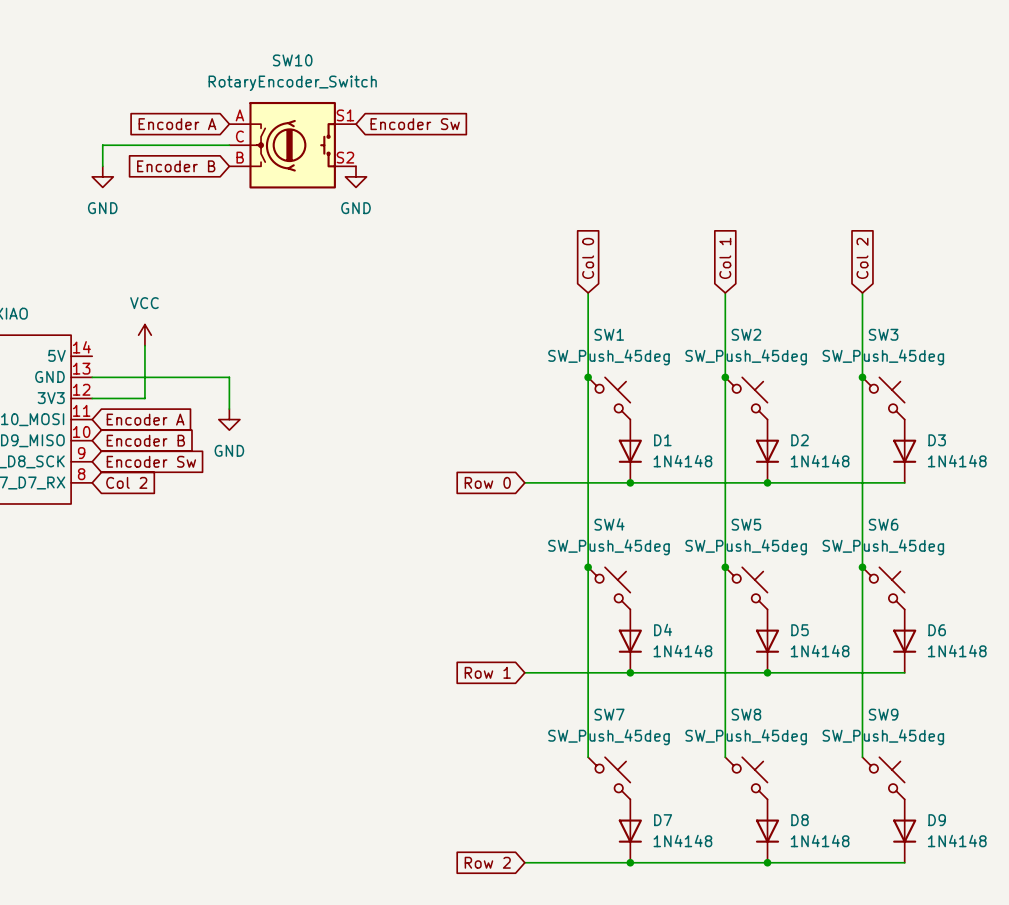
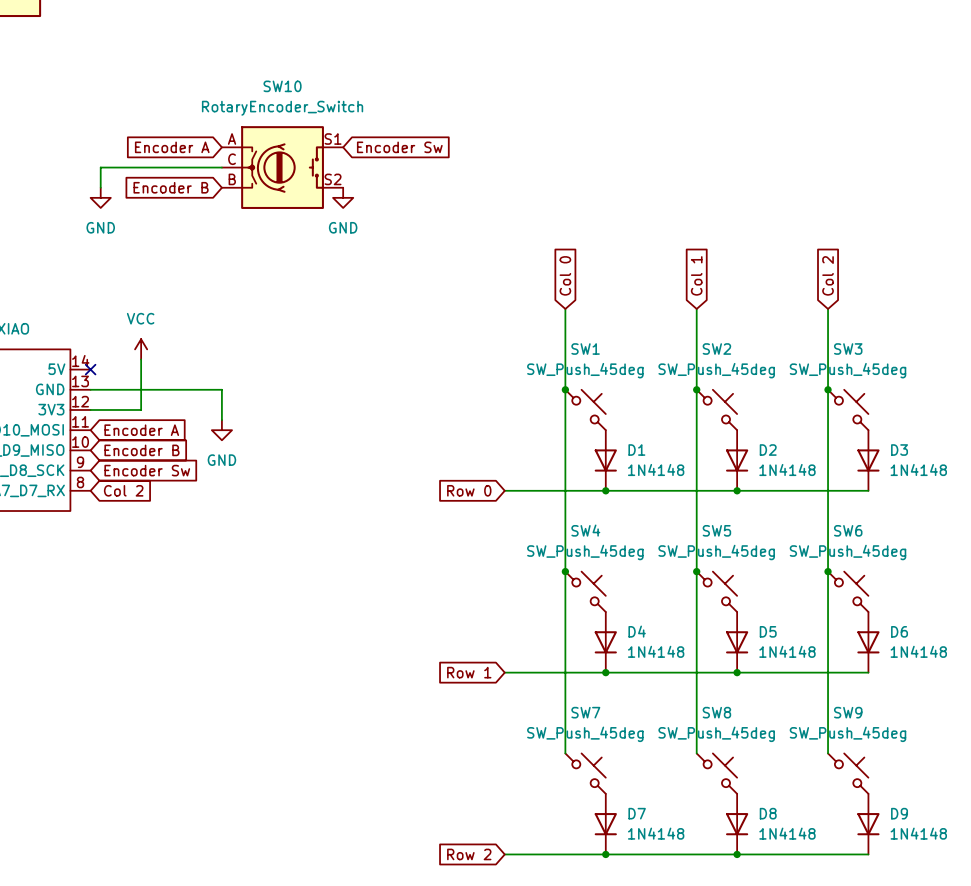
no-connect mark: none -> (90, 369)

